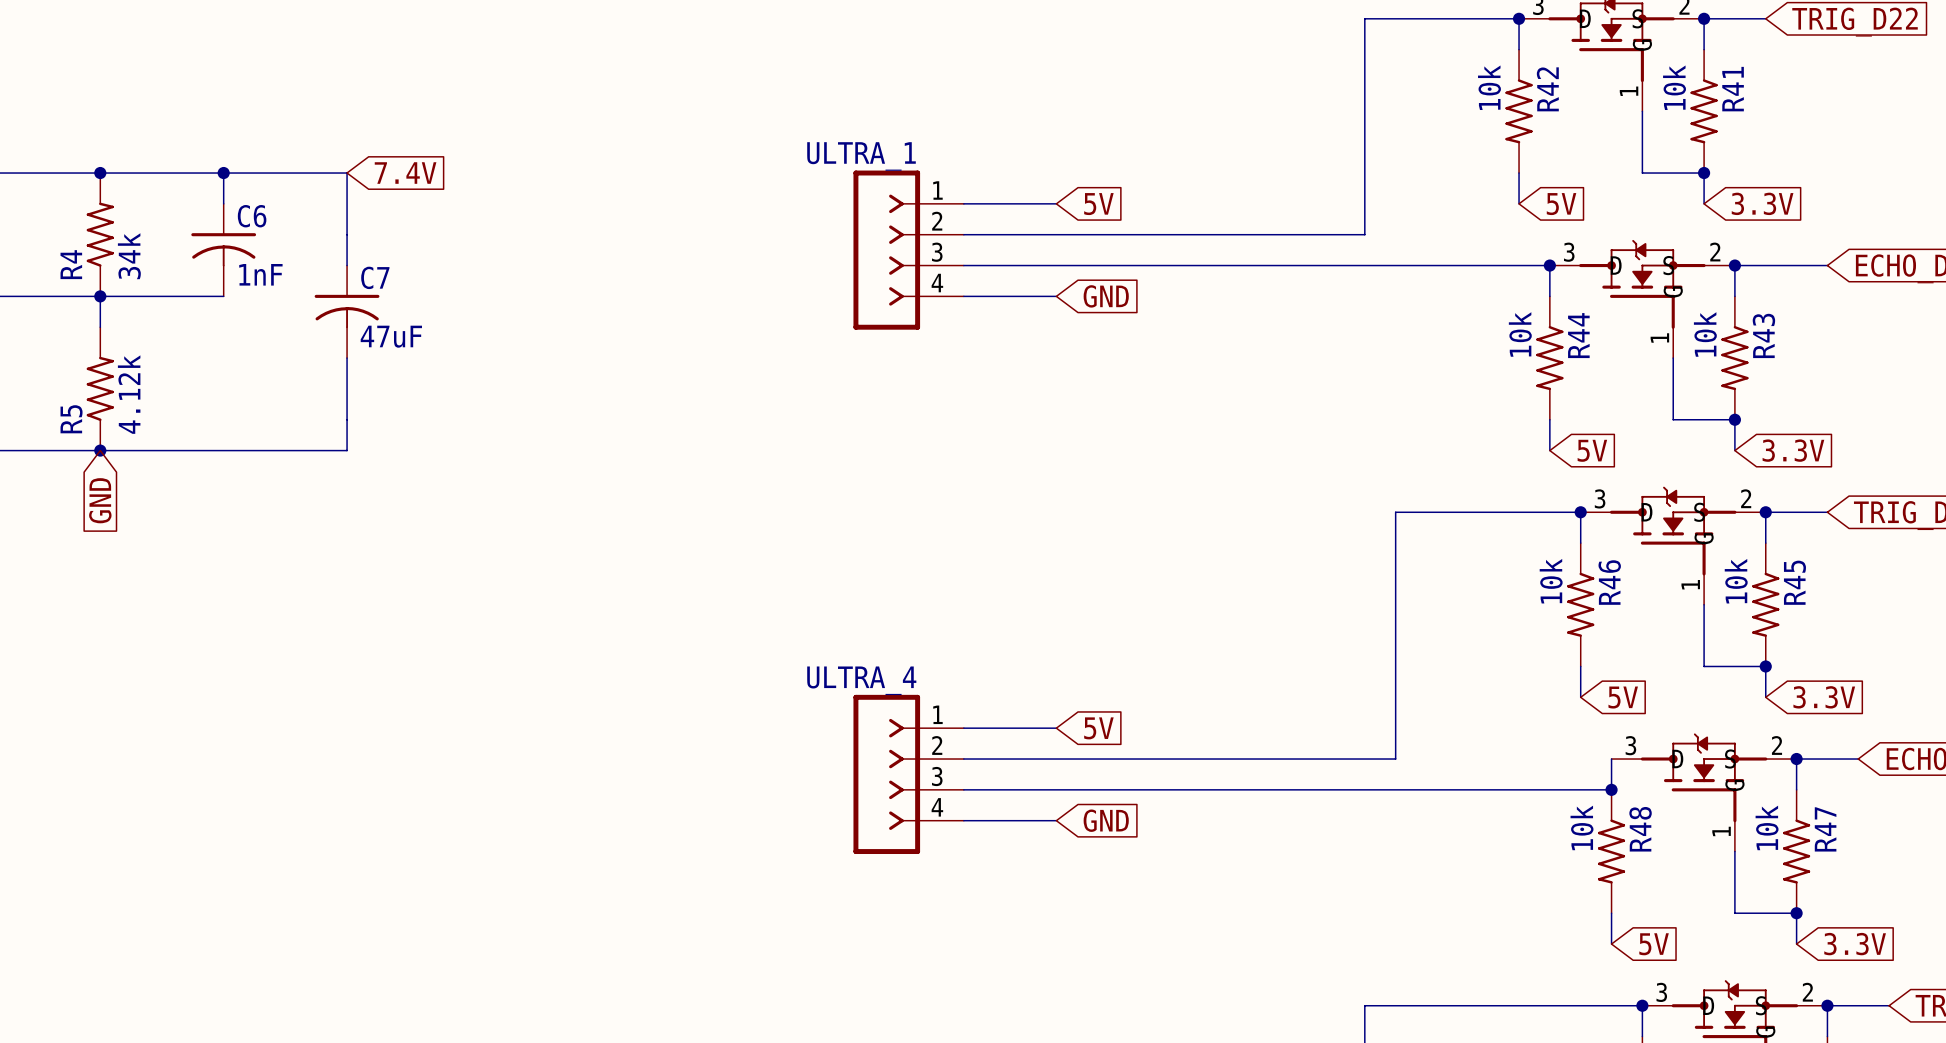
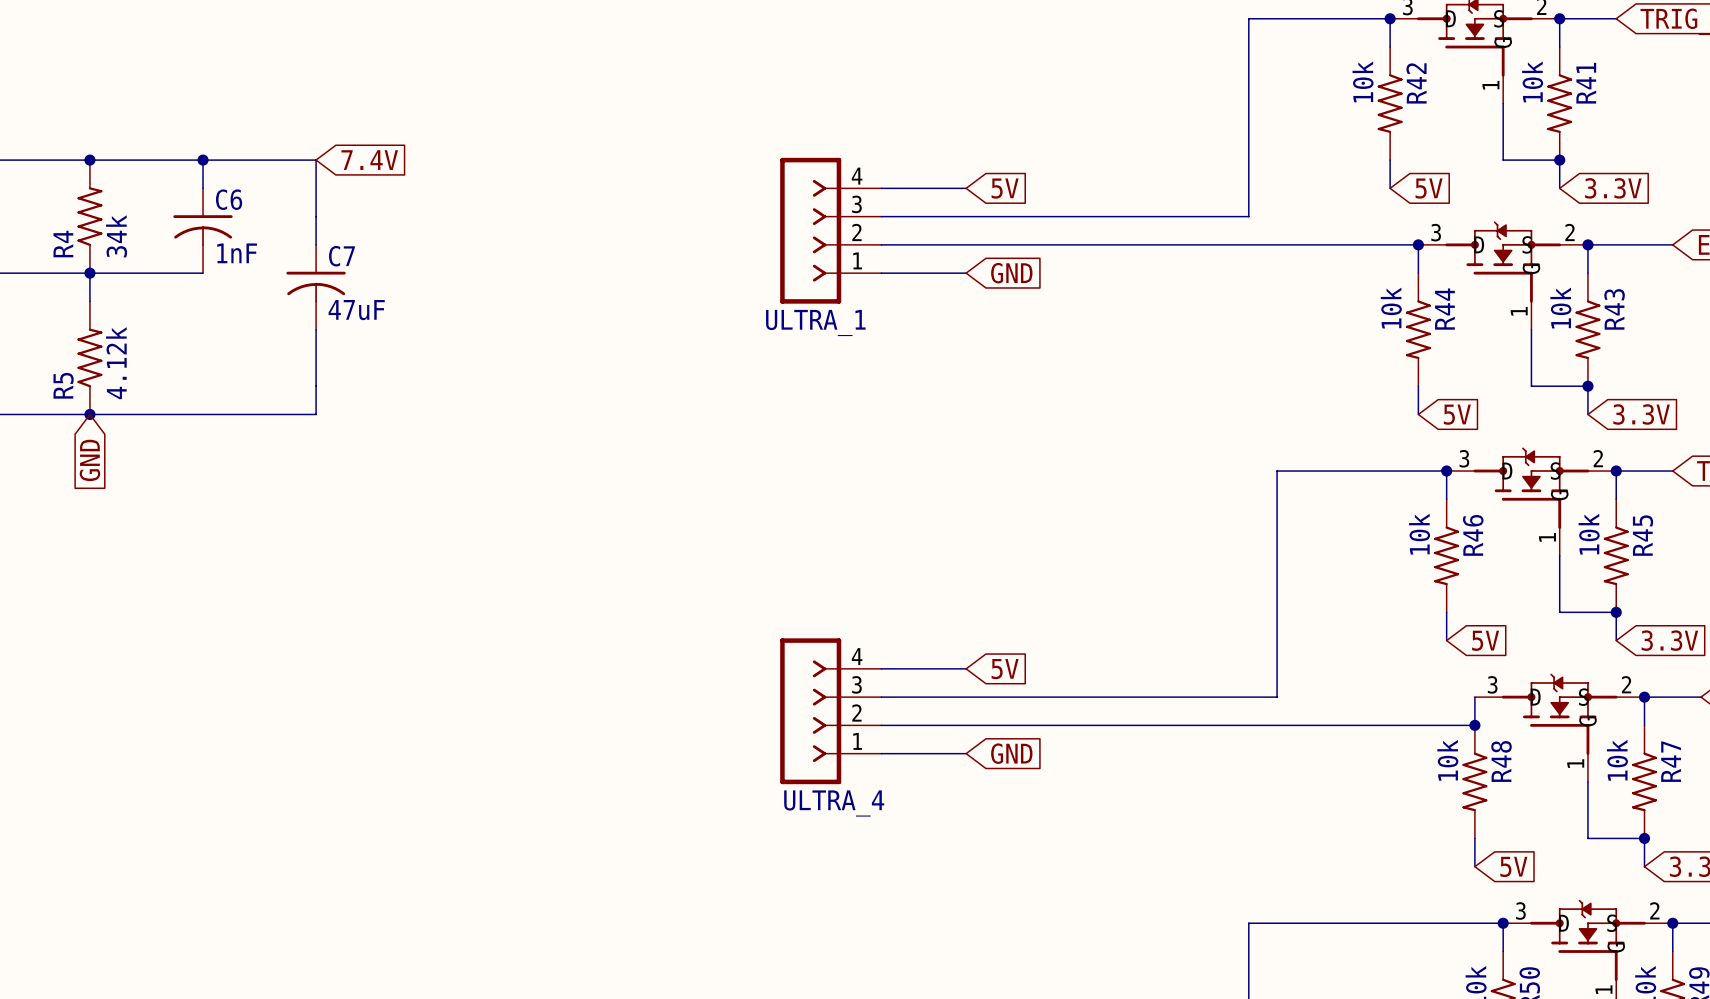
ULTRA_1 name position: ULTRA_1 (861, 156) -> ULTRA_1 (815, 322)
ULTRA_1 flip: as is (886, 250) -> up-down (810, 230)
ULTRA_4 name position: ULTRA_4 (861, 680) -> ULTRA_4 (834, 803)
ULTRA_4 flip: as is (886, 774) -> up-down (810, 711)

